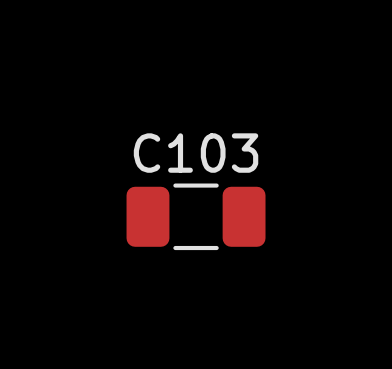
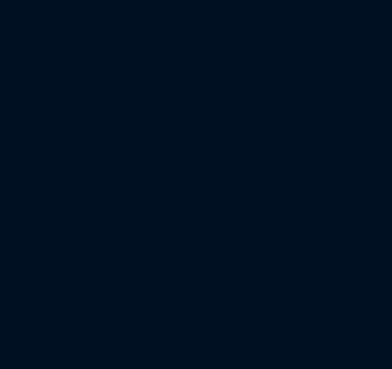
C103: (196, 216) -> none

